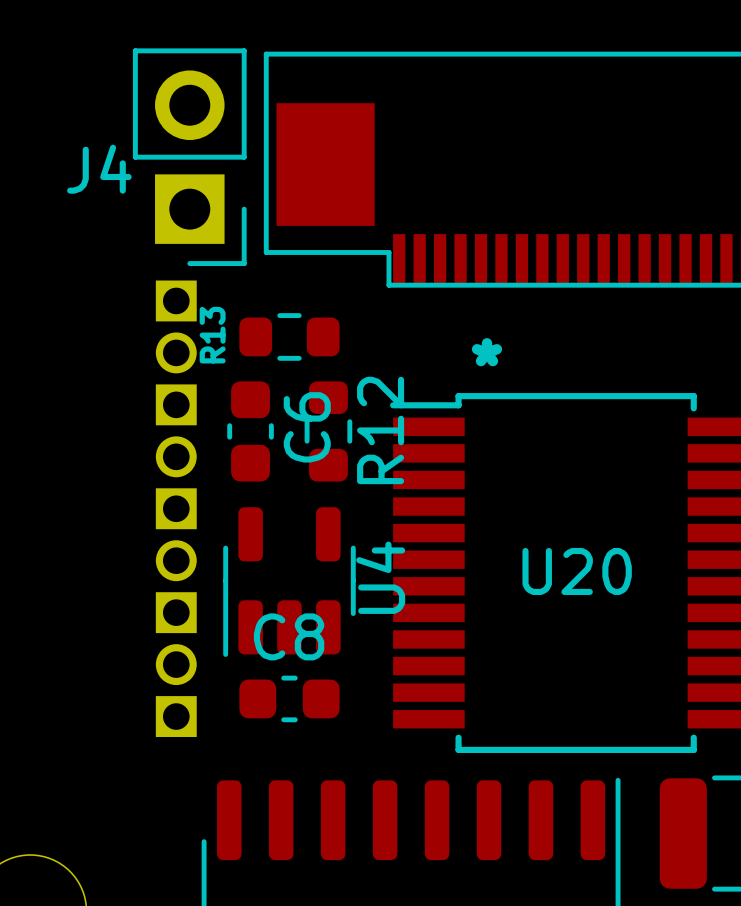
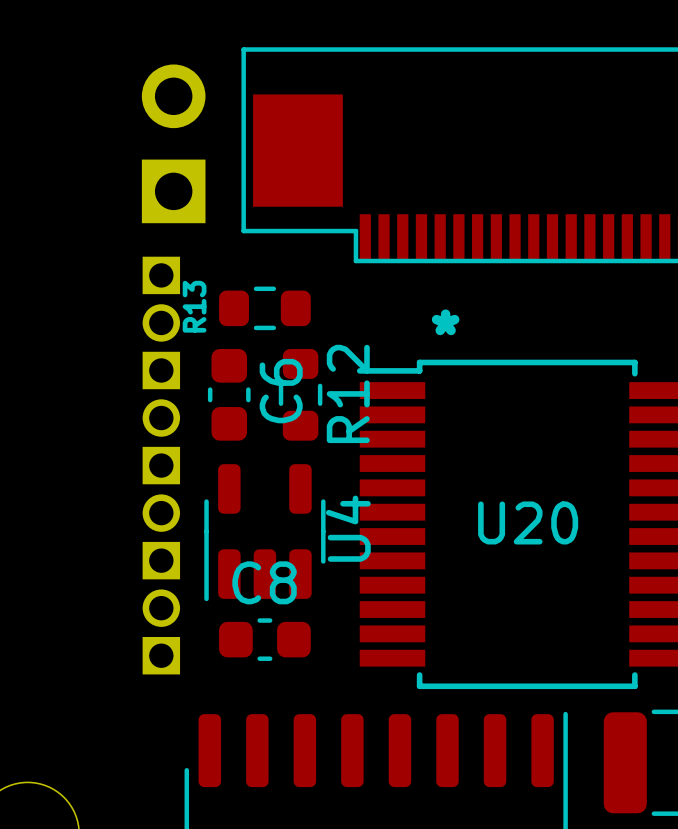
J4 side: top (189, 157) -> bottom (173, 143)

